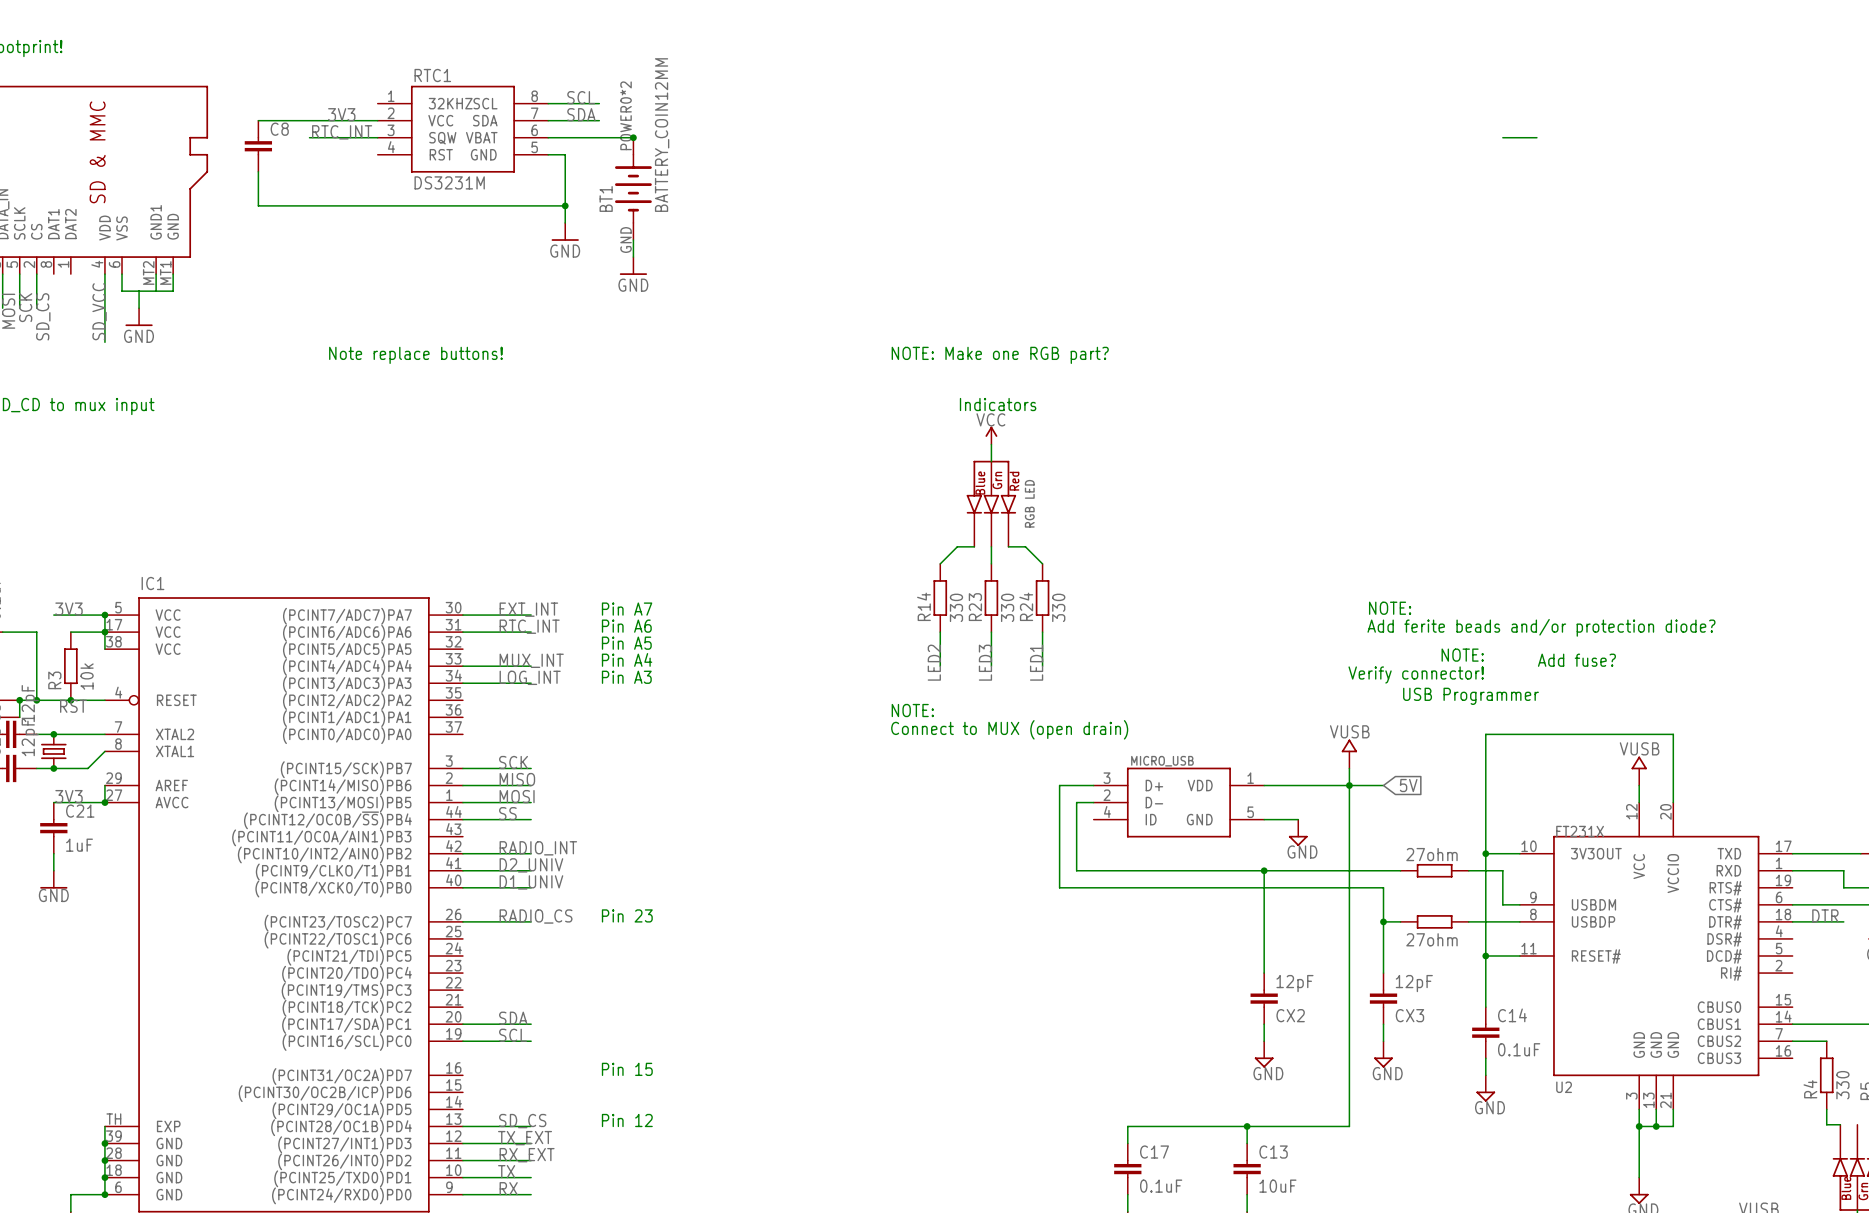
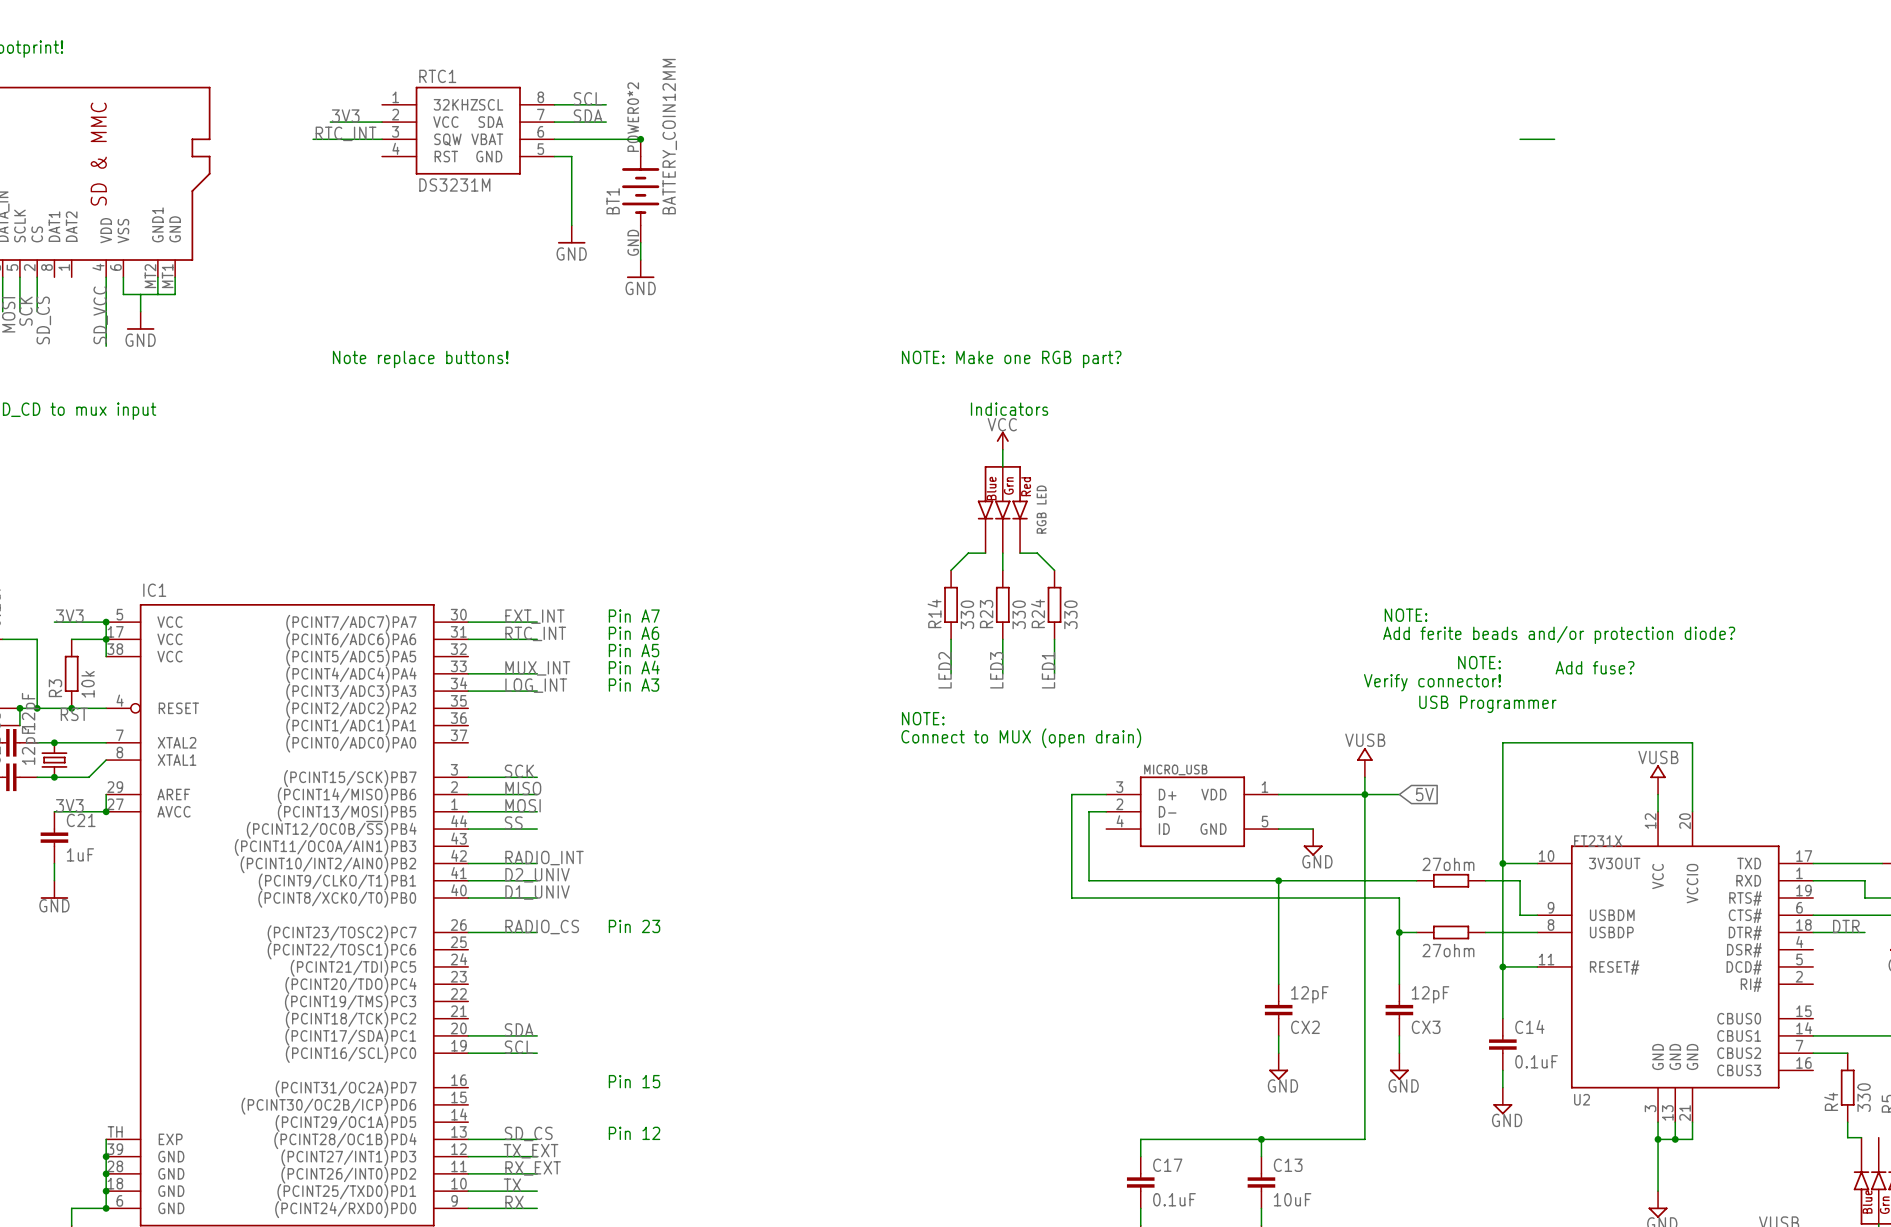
wire: (258, 120) (326, 120) -> none
C8: (258, 146) -> none
wire: (258, 171) (258, 205) (565, 205) -> none
junction: (565, 205) -> none

